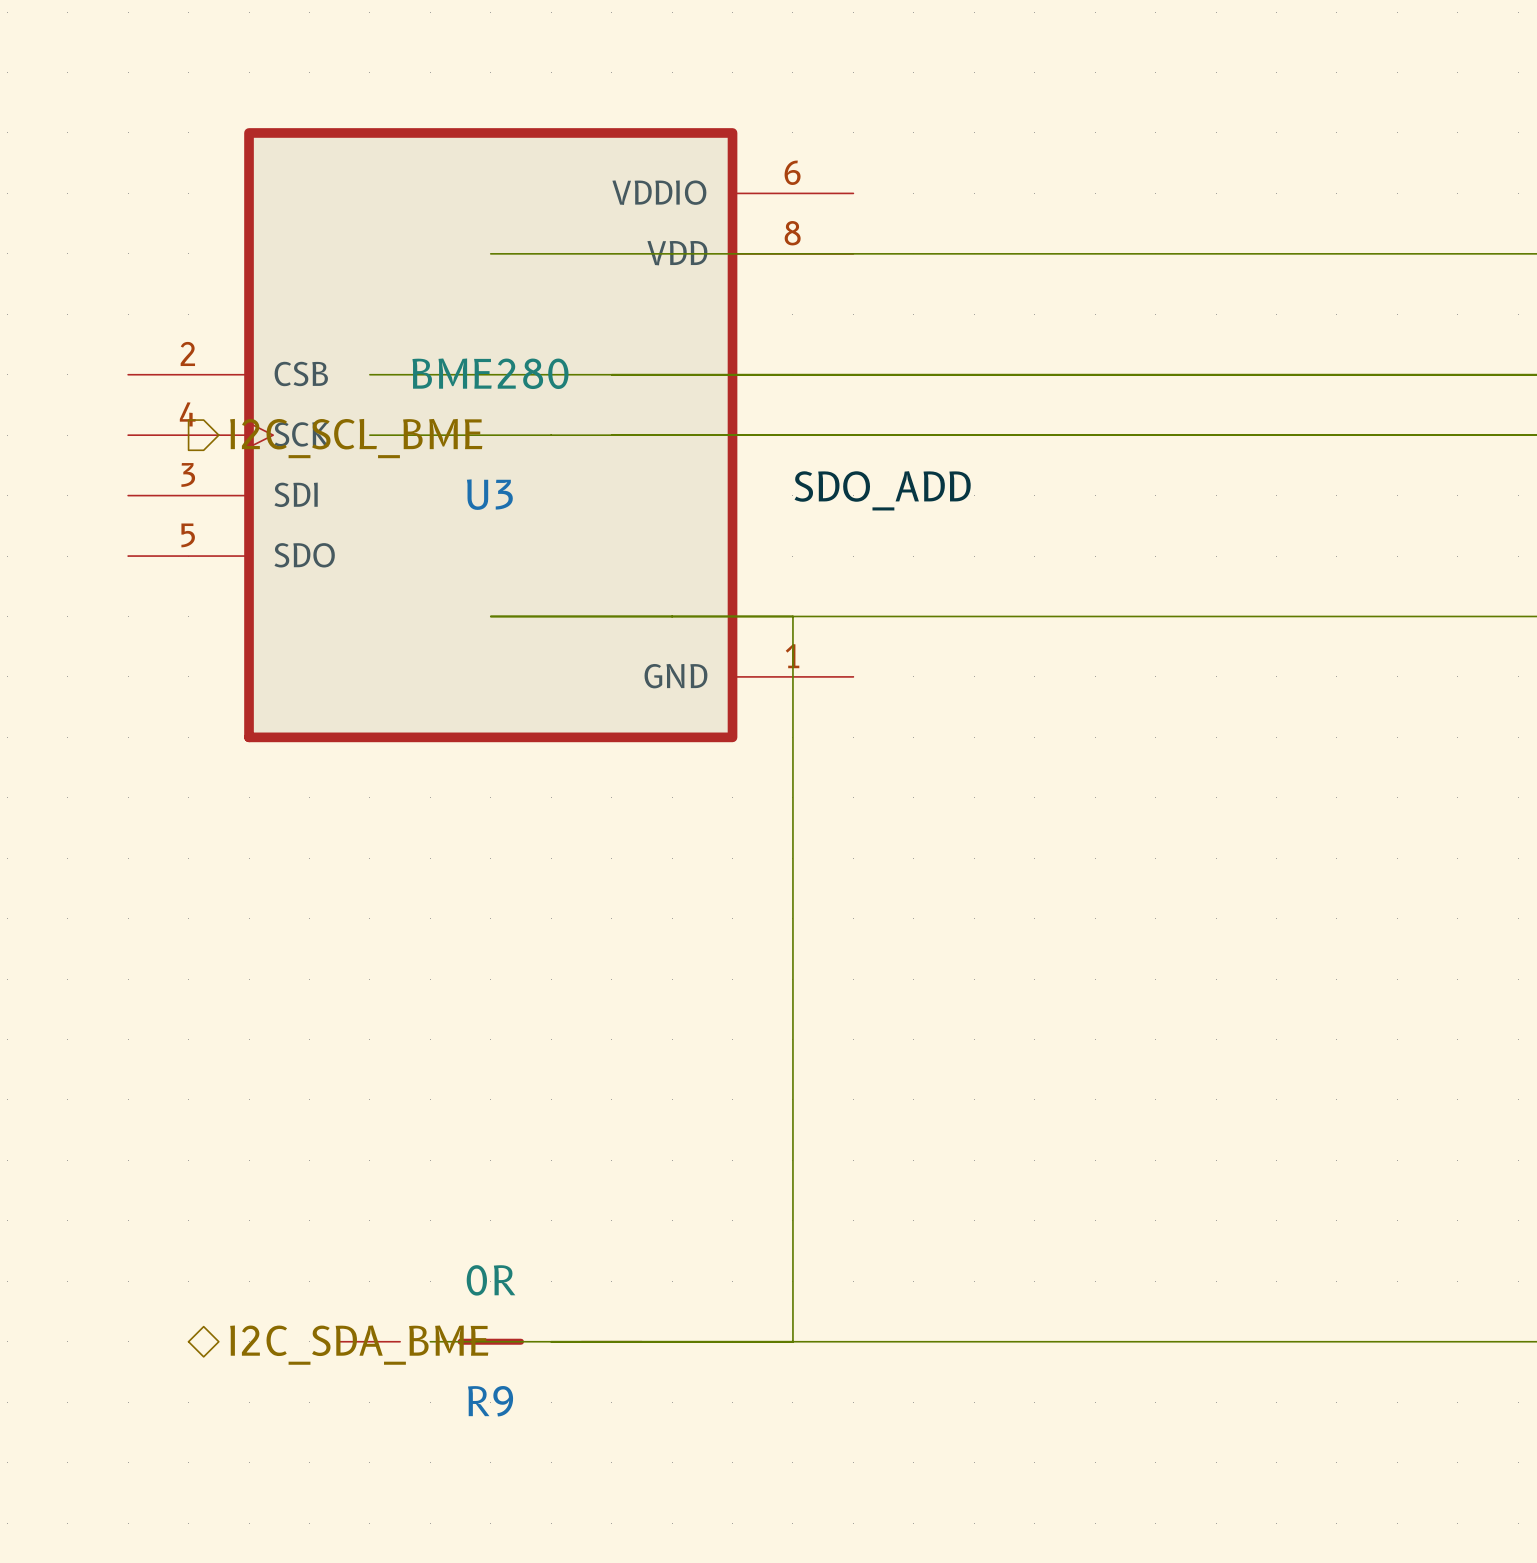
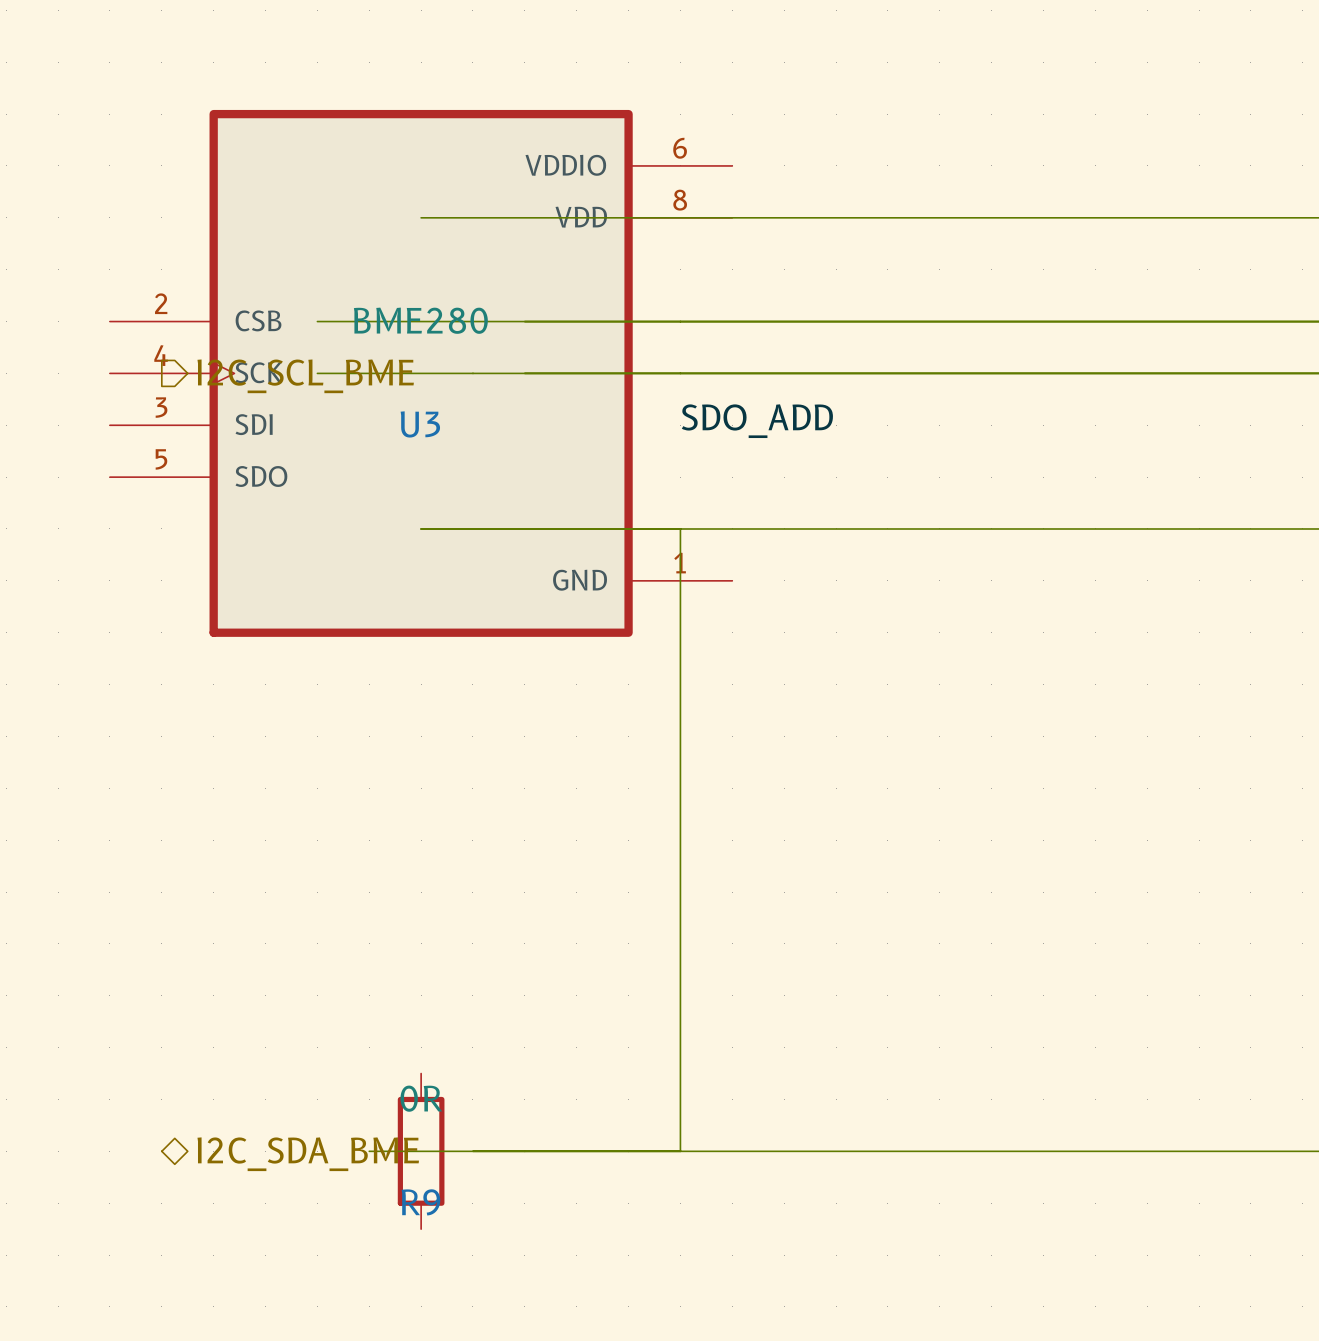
R9 symbol: [339, 1338, 642, 1345] -> [397, 1073, 445, 1230]

